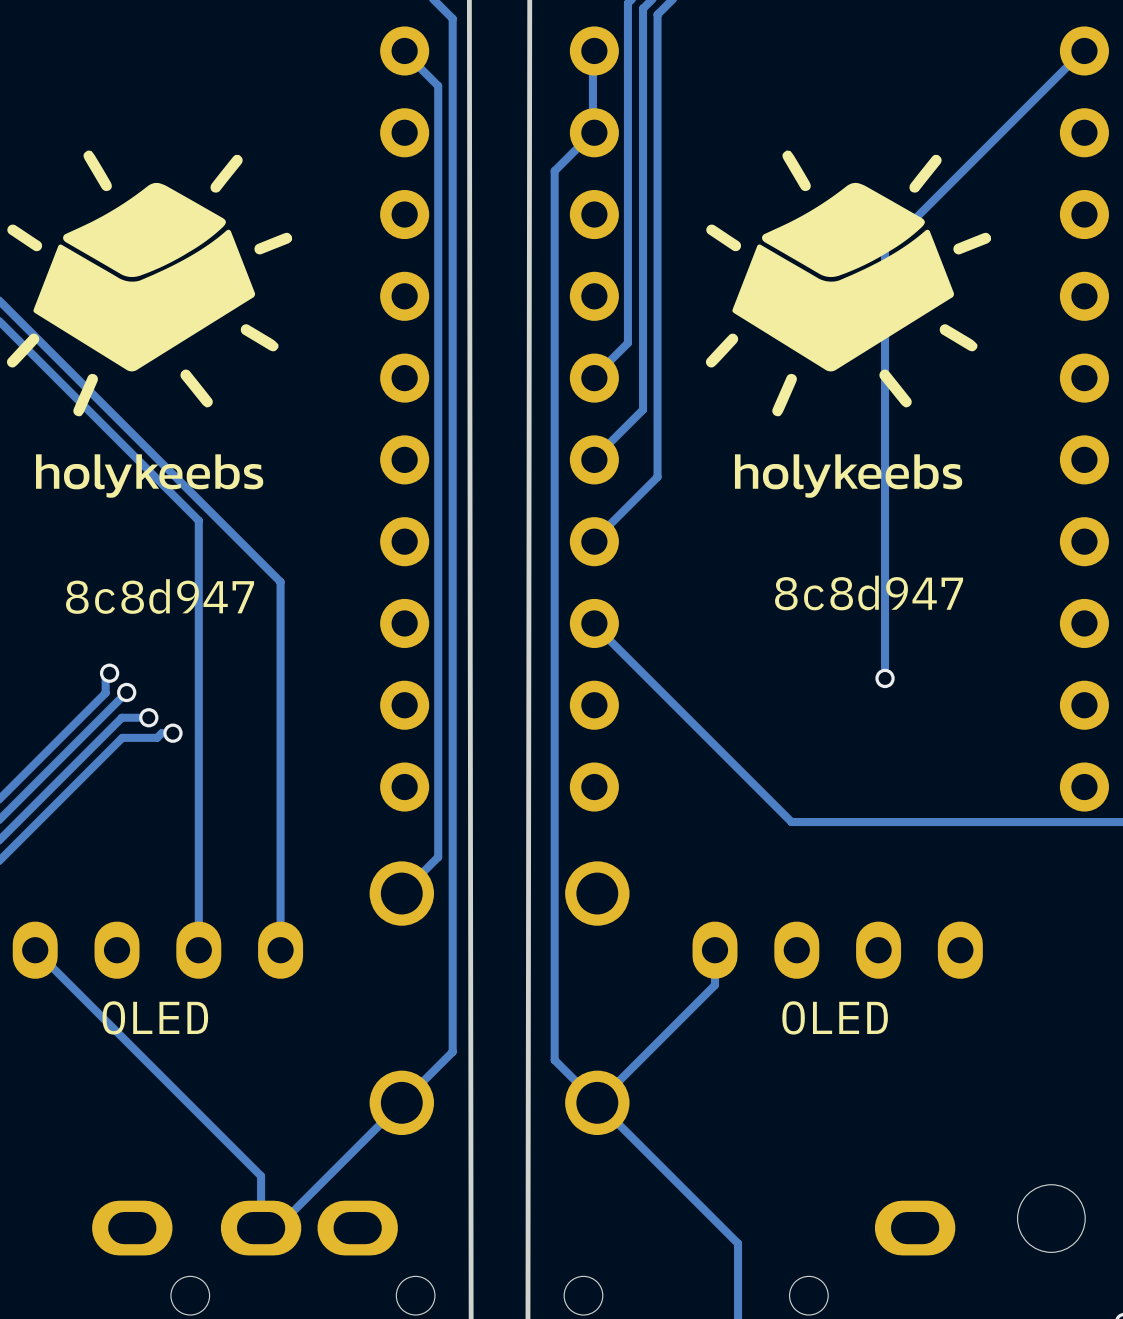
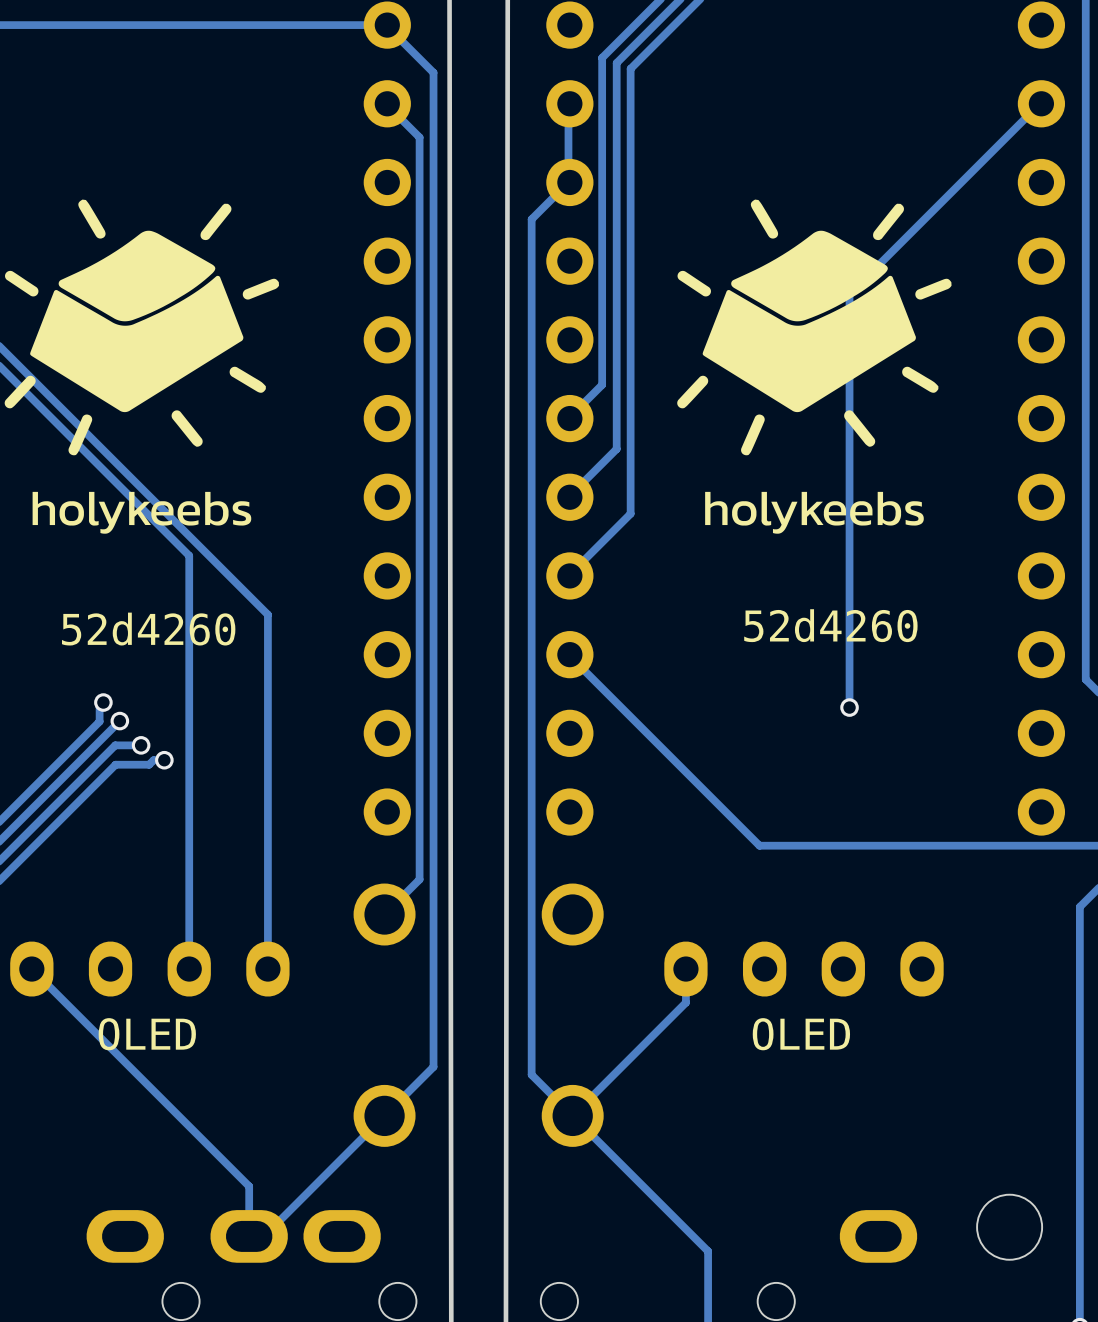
text: 8c8d947 (869, 593) -> 52d4260 (830, 625)
text: 8c8d947 (160, 596) -> 52d4260 (148, 629)

